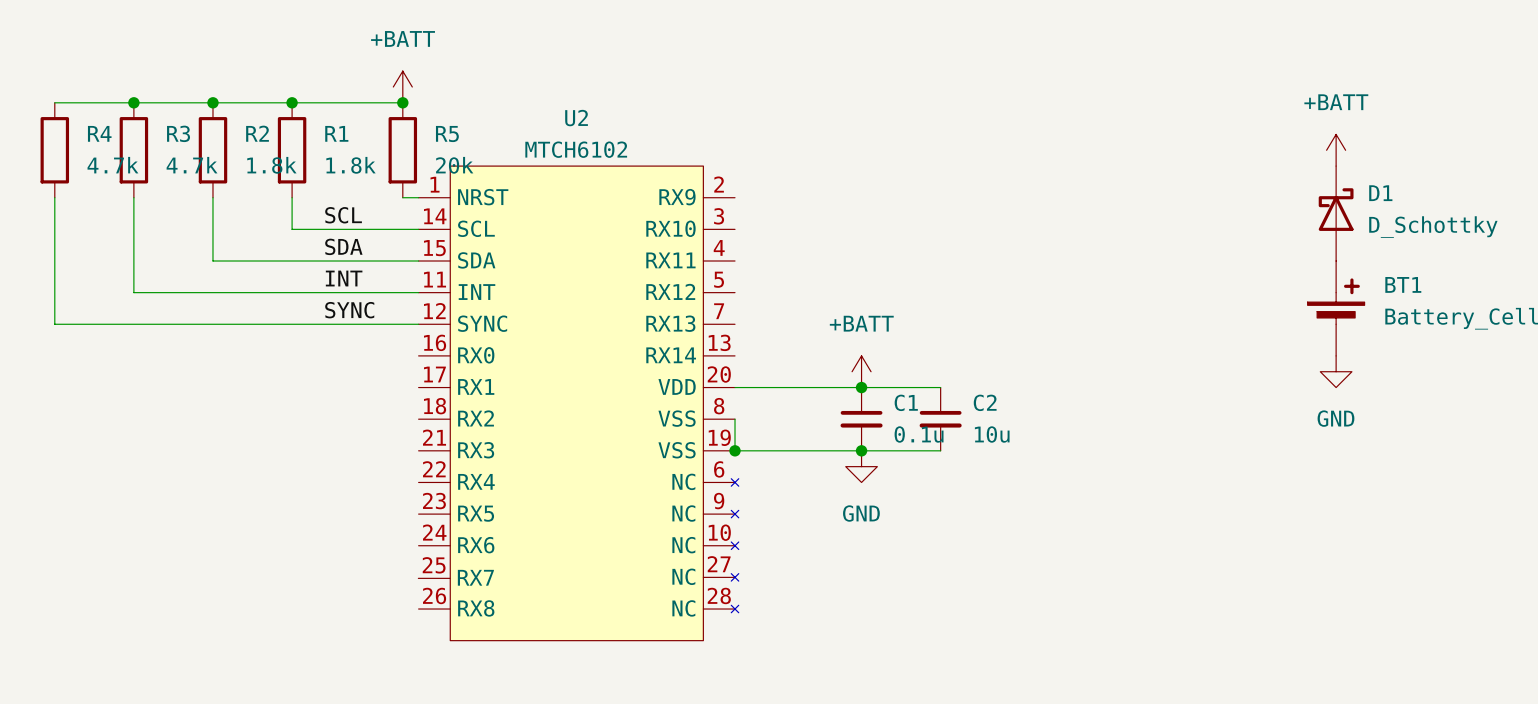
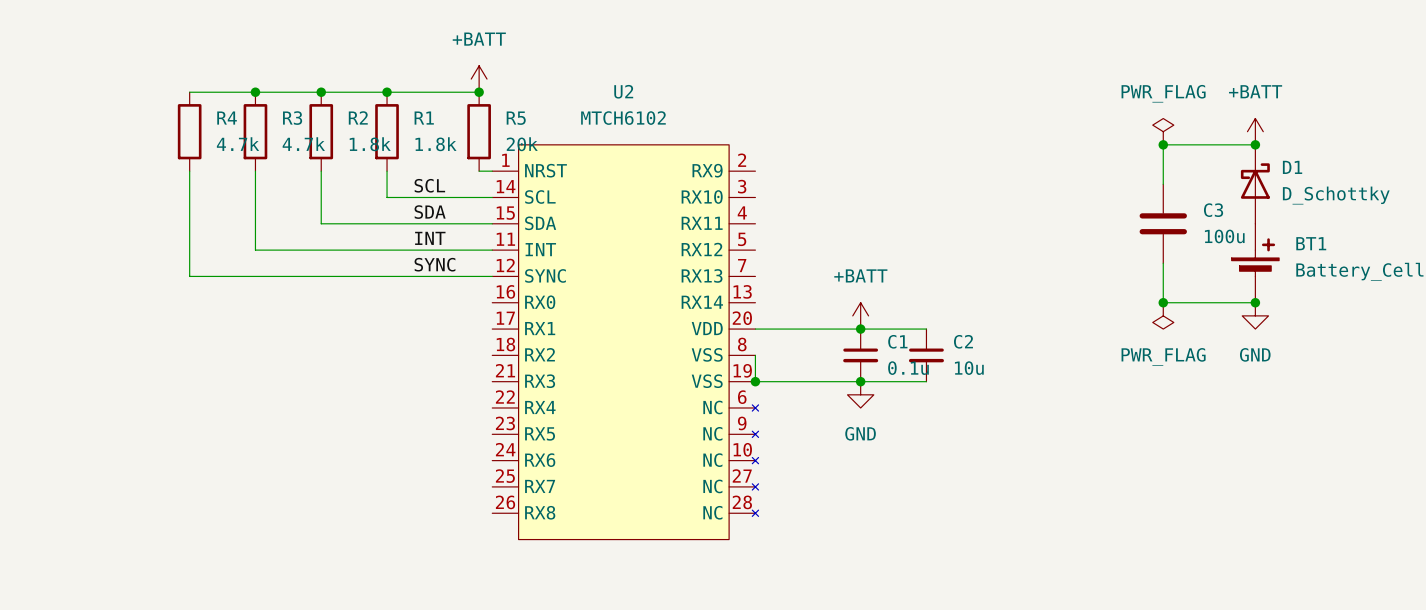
power symbol: none -> PWR_FLAG (1163, 131)
U2 symbol: [418, 166, 739, 641] -> [492, 144, 759, 540]
junction: none -> (1163, 144)
wire: none -> (1255, 144) (1163, 144) (1163, 184)
junction: none -> (1255, 144)
C3: none -> 100u (1163, 223)
wire: none -> (1163, 263) (1163, 302) (1255, 302)
junction: none -> (1163, 302)
junction: none -> (1255, 302)
power symbol: none -> PWR_FLAG (1163, 315)

